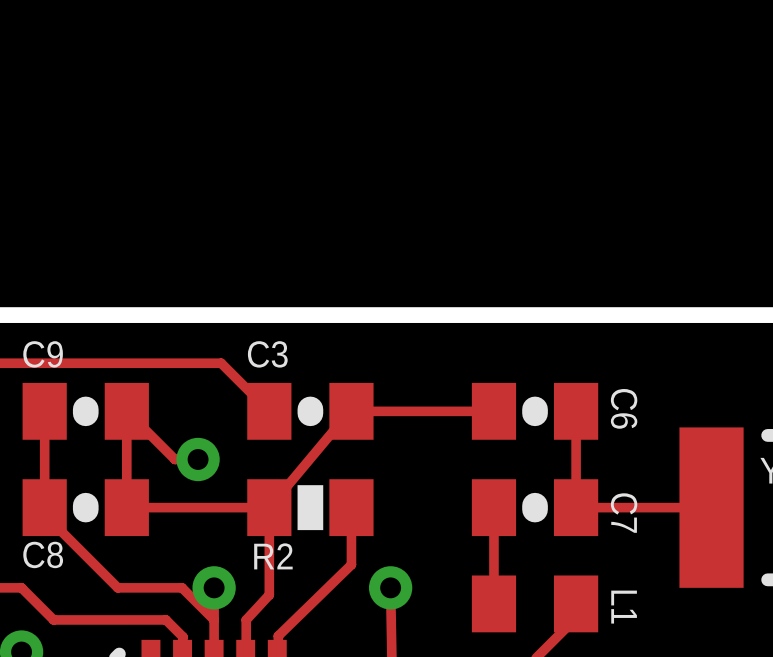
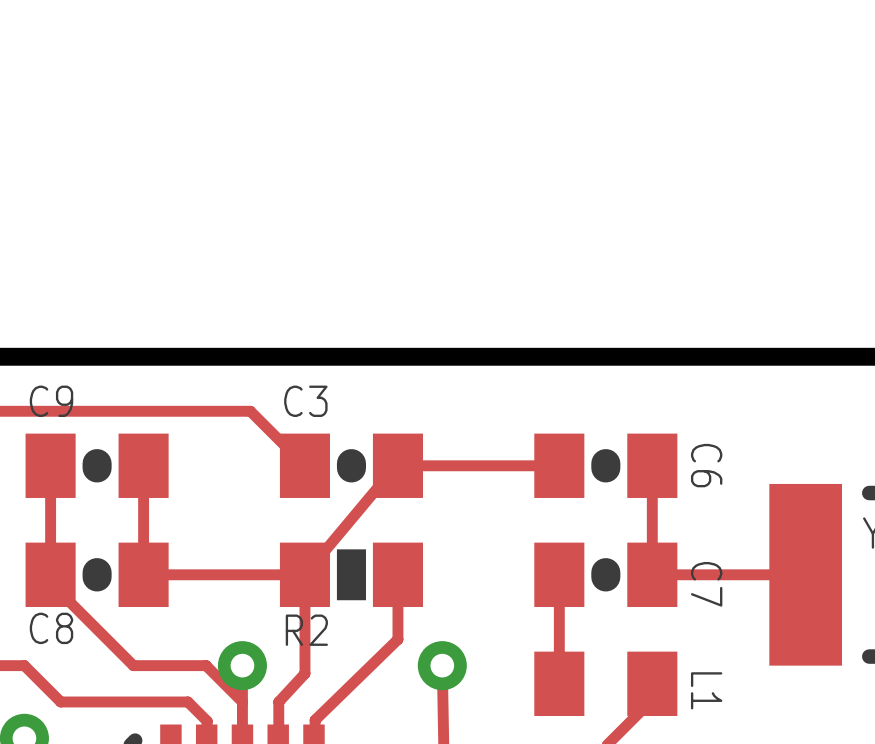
track: (126, 411) (174, 459) (198, 459) -> none
via: (198, 459) -> none

